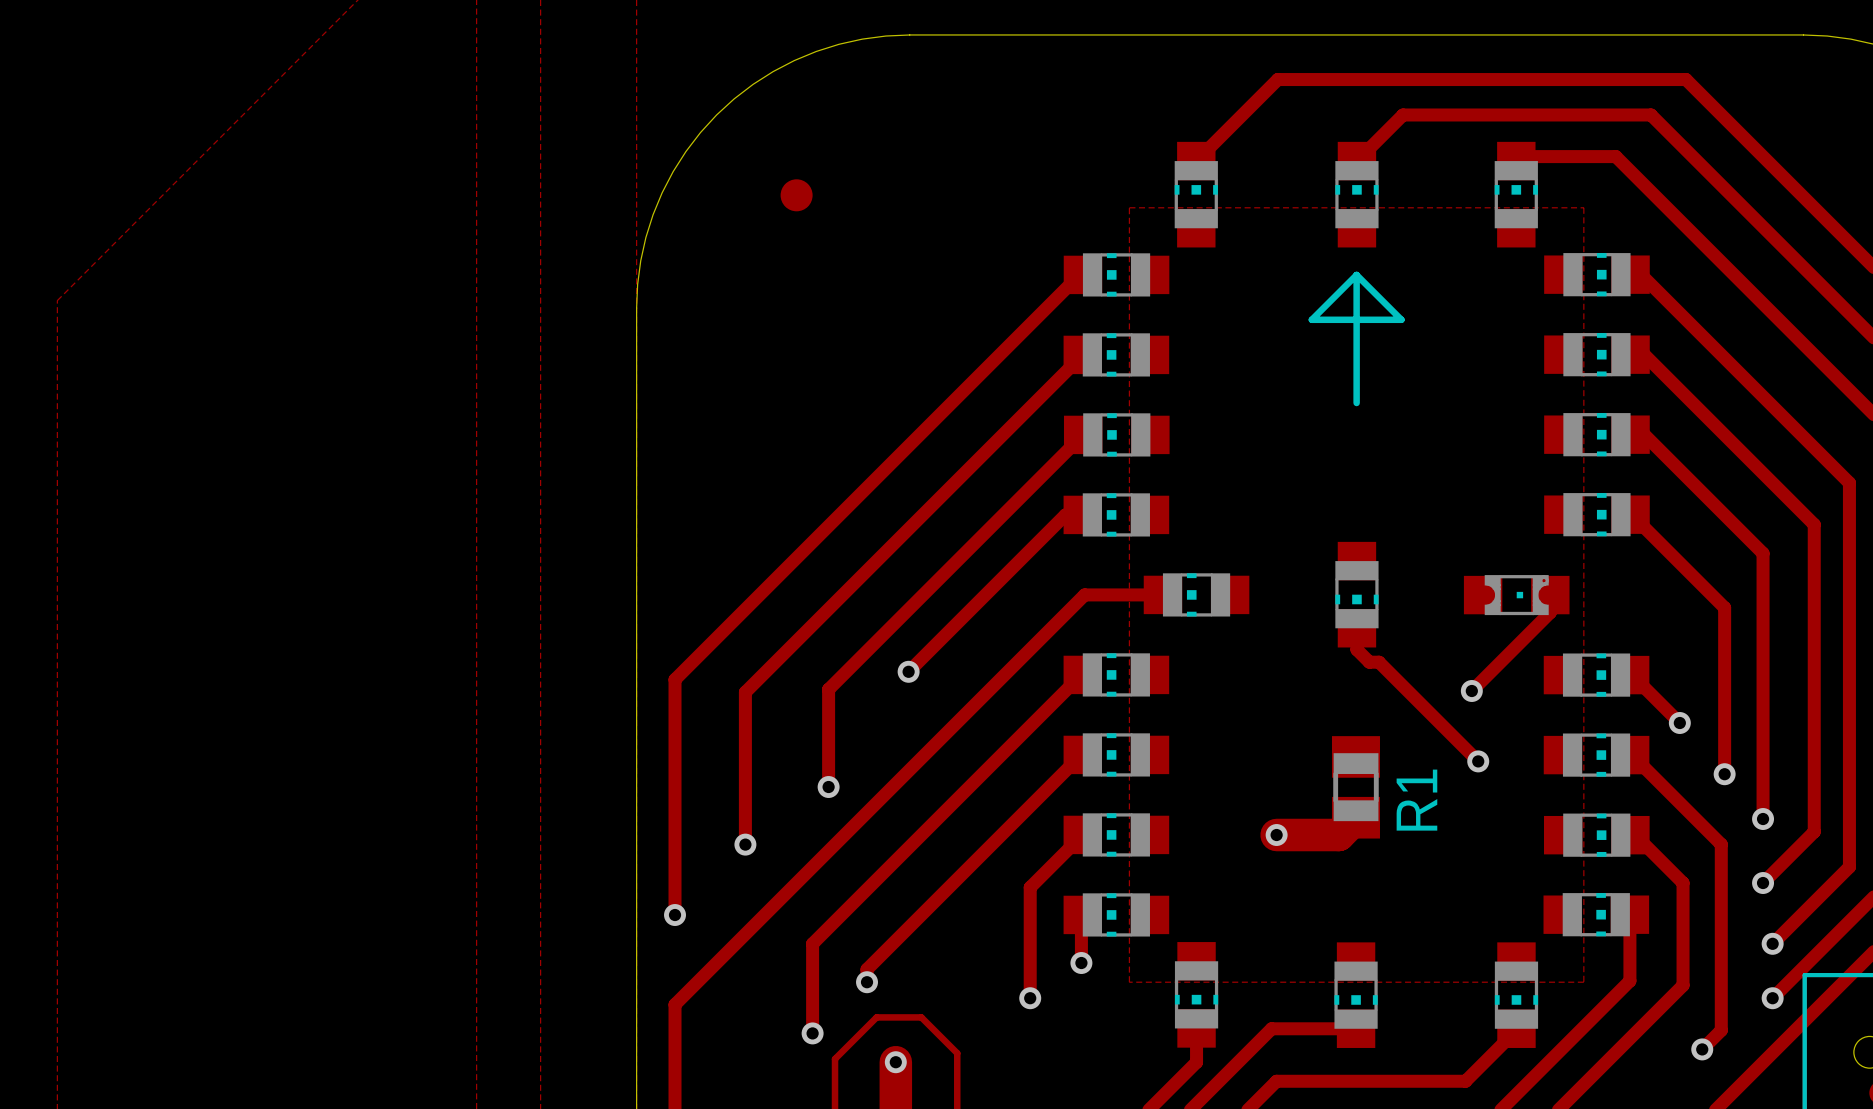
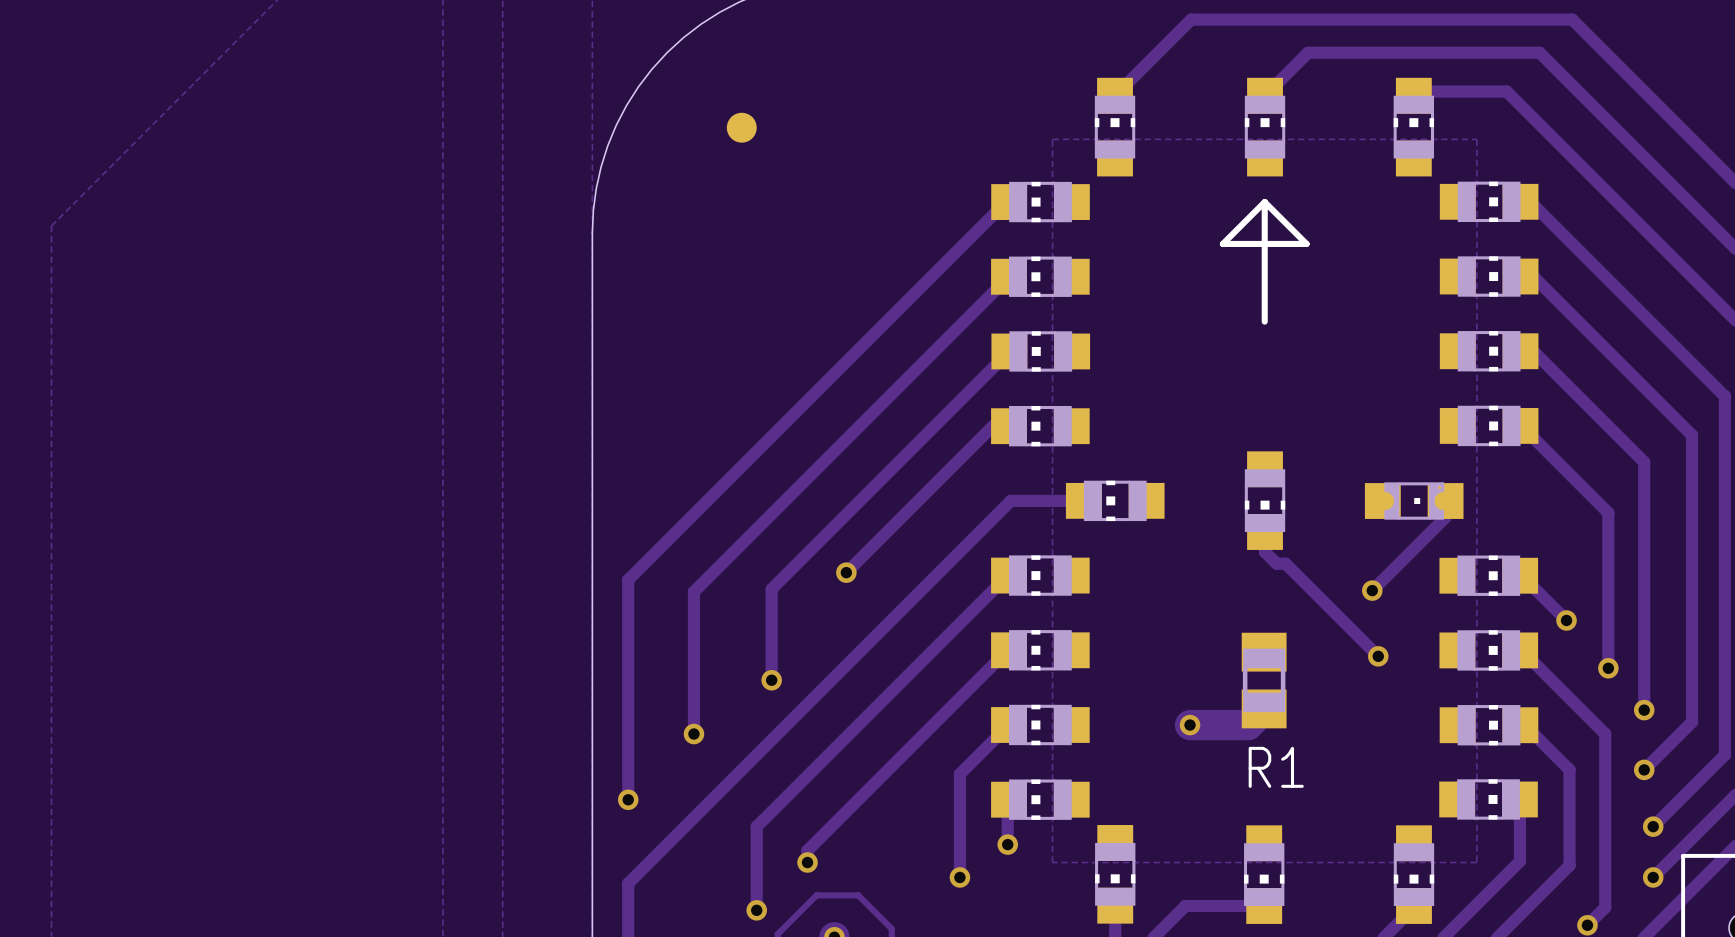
R1 name rotation: 0° (1416, 800) -> 90° clockwise (1276, 767)

